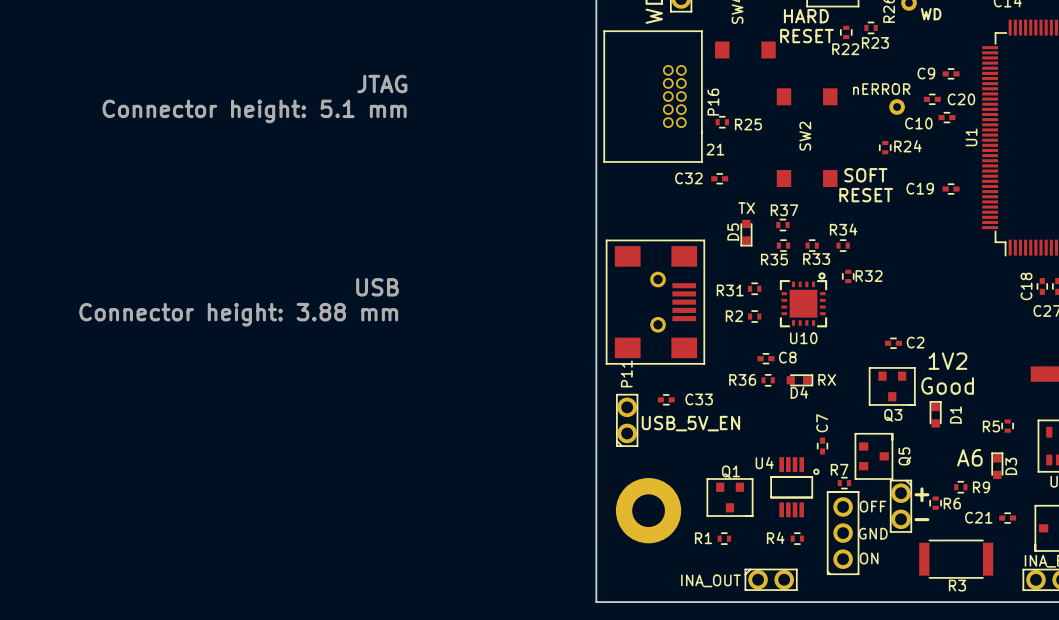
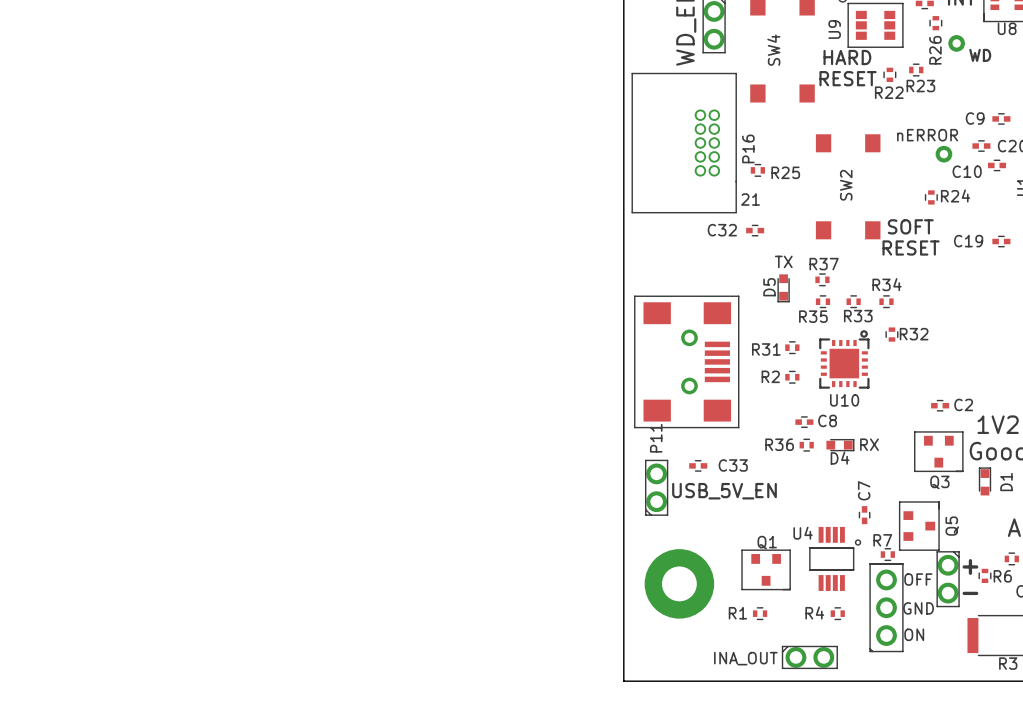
text: JTAG (382, 84) -> none
text: Connector height: 5.1 mm (254, 111) -> none
text: USB (377, 287) -> none
text: Connector height: 3.88 mm (238, 314) -> none

